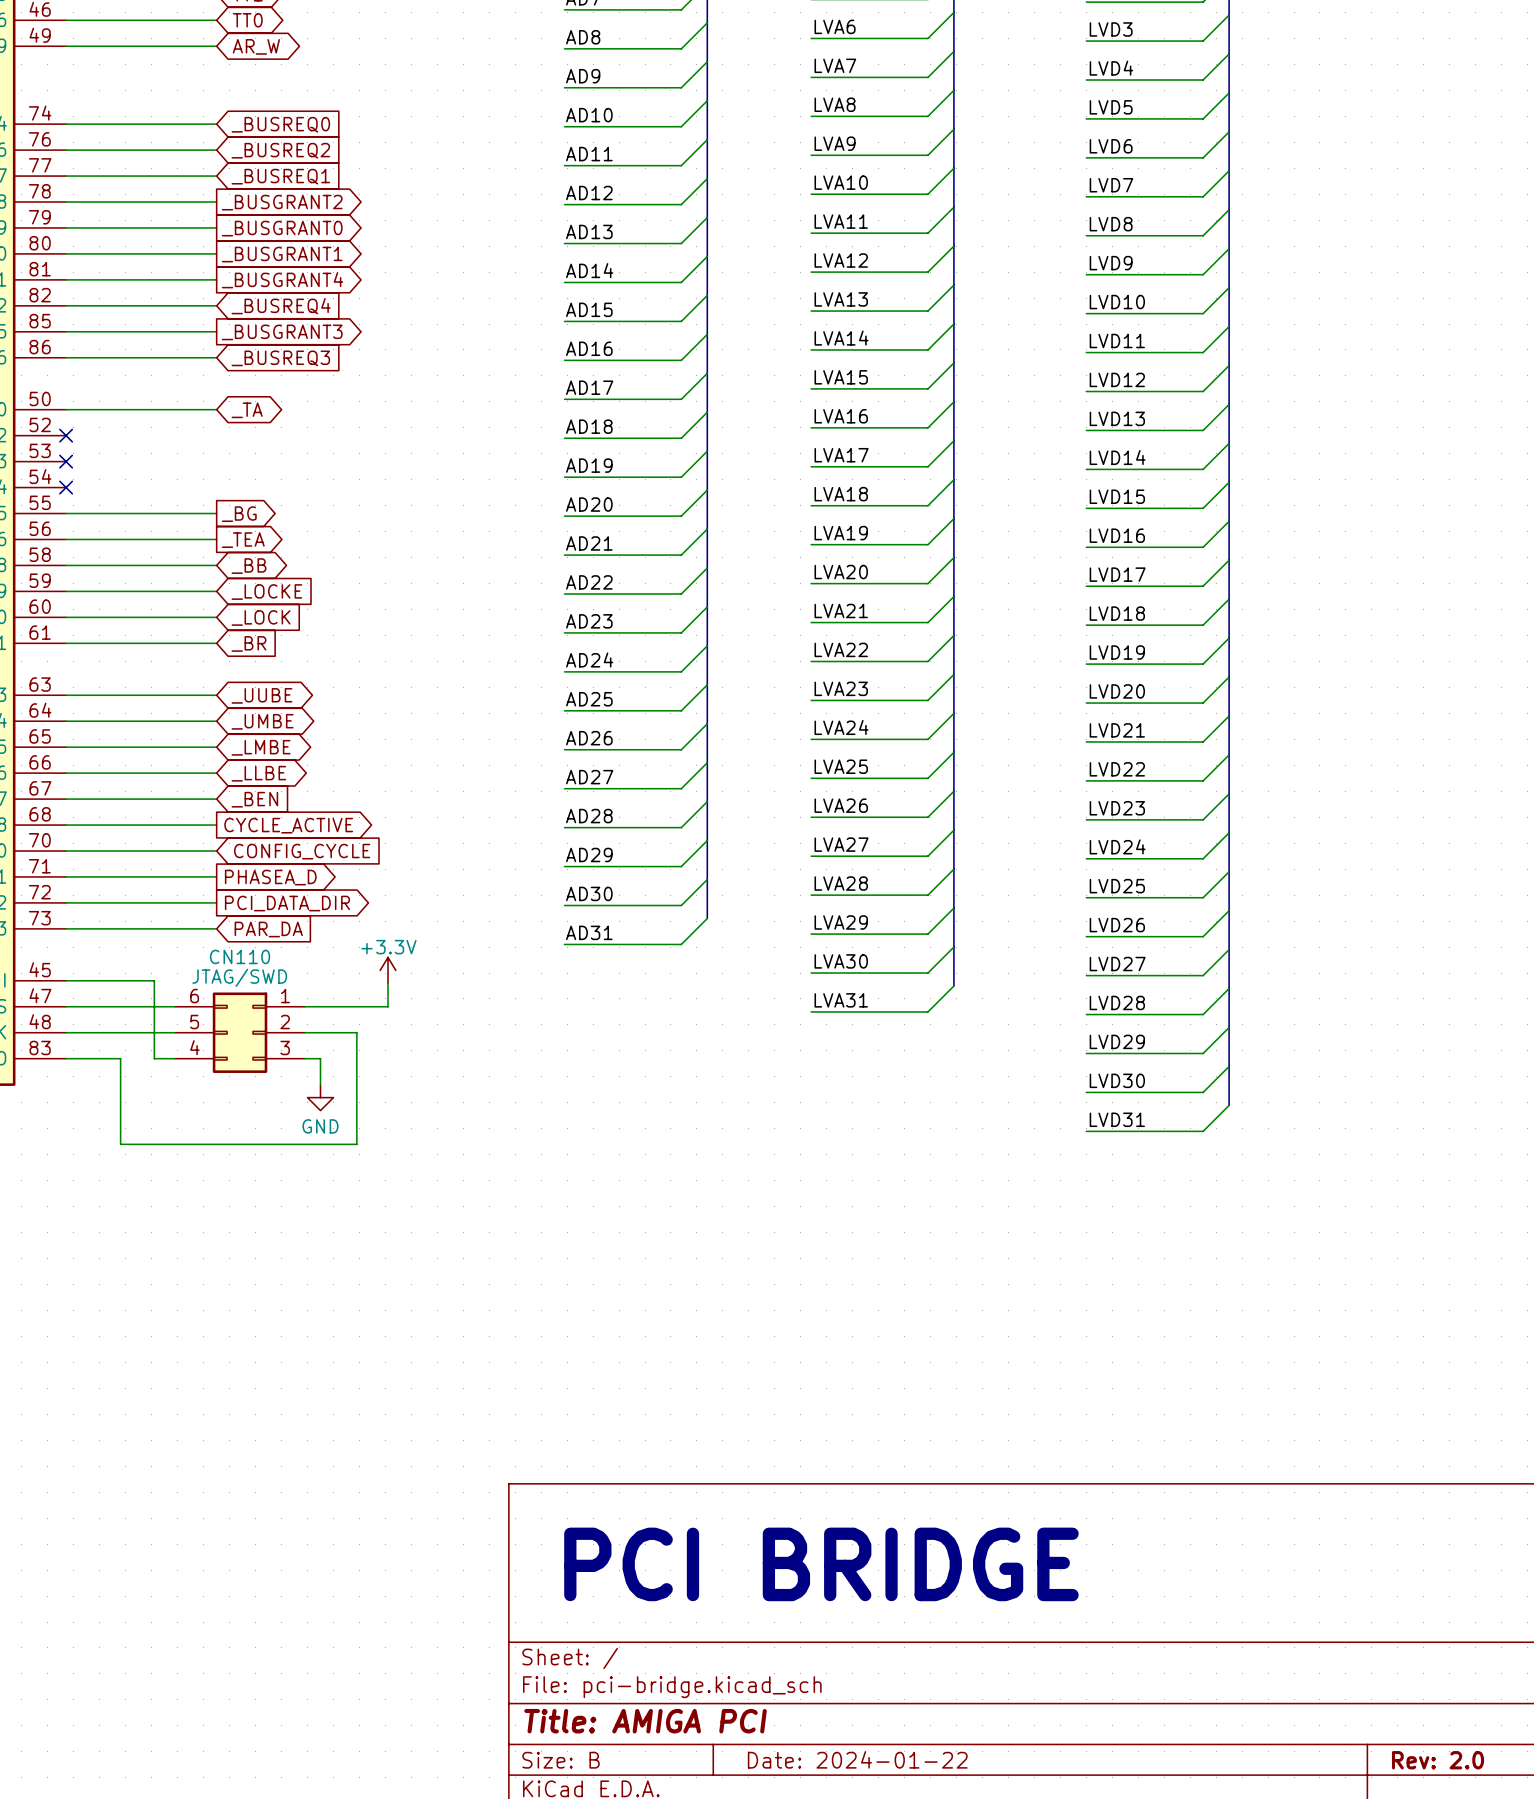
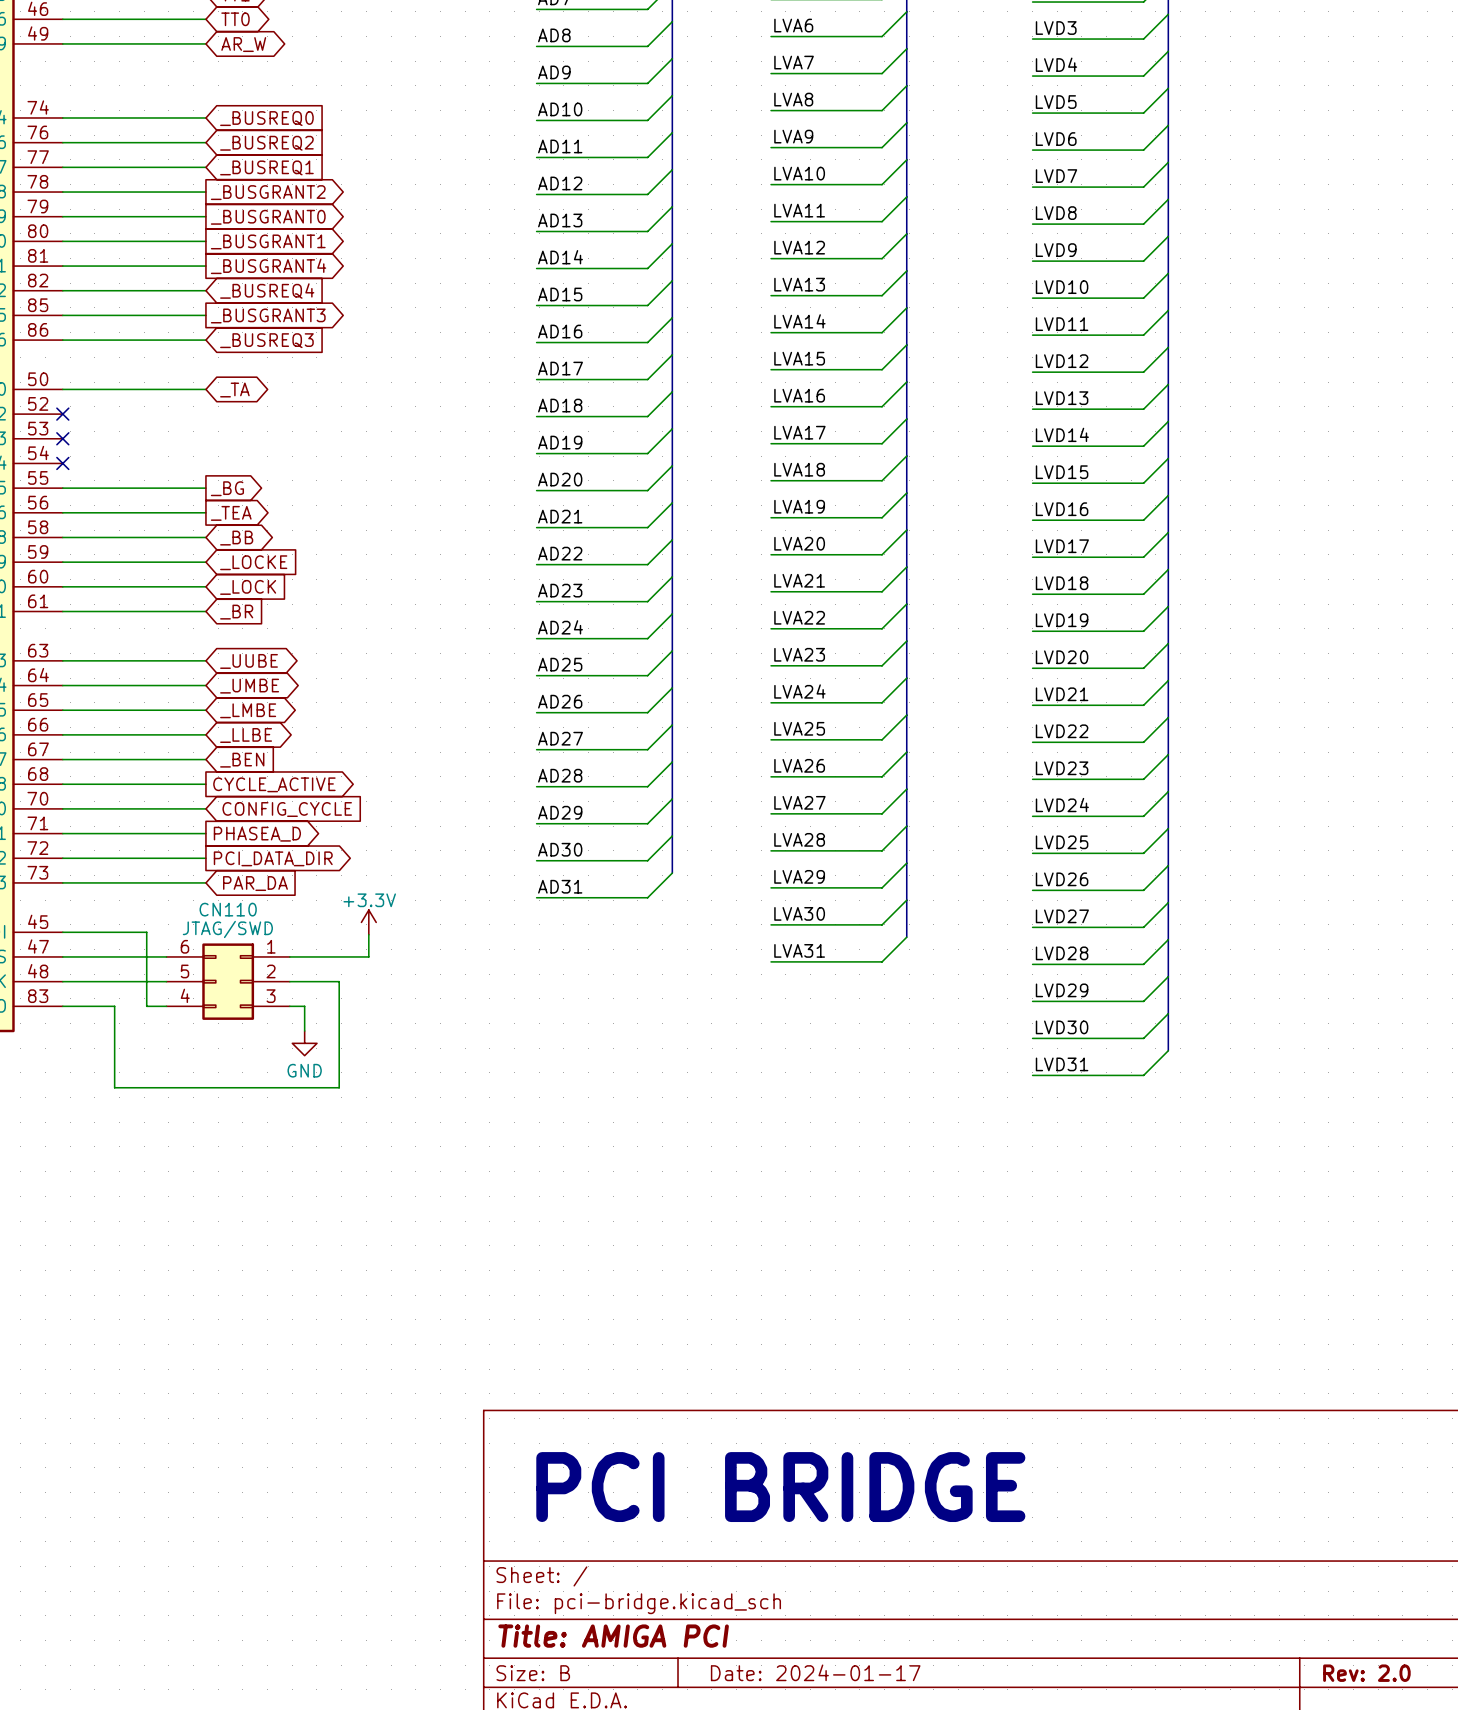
title block: Date: 2024-01-22 (857, 1759) -> Date: 2024-01-17 (815, 1672)

